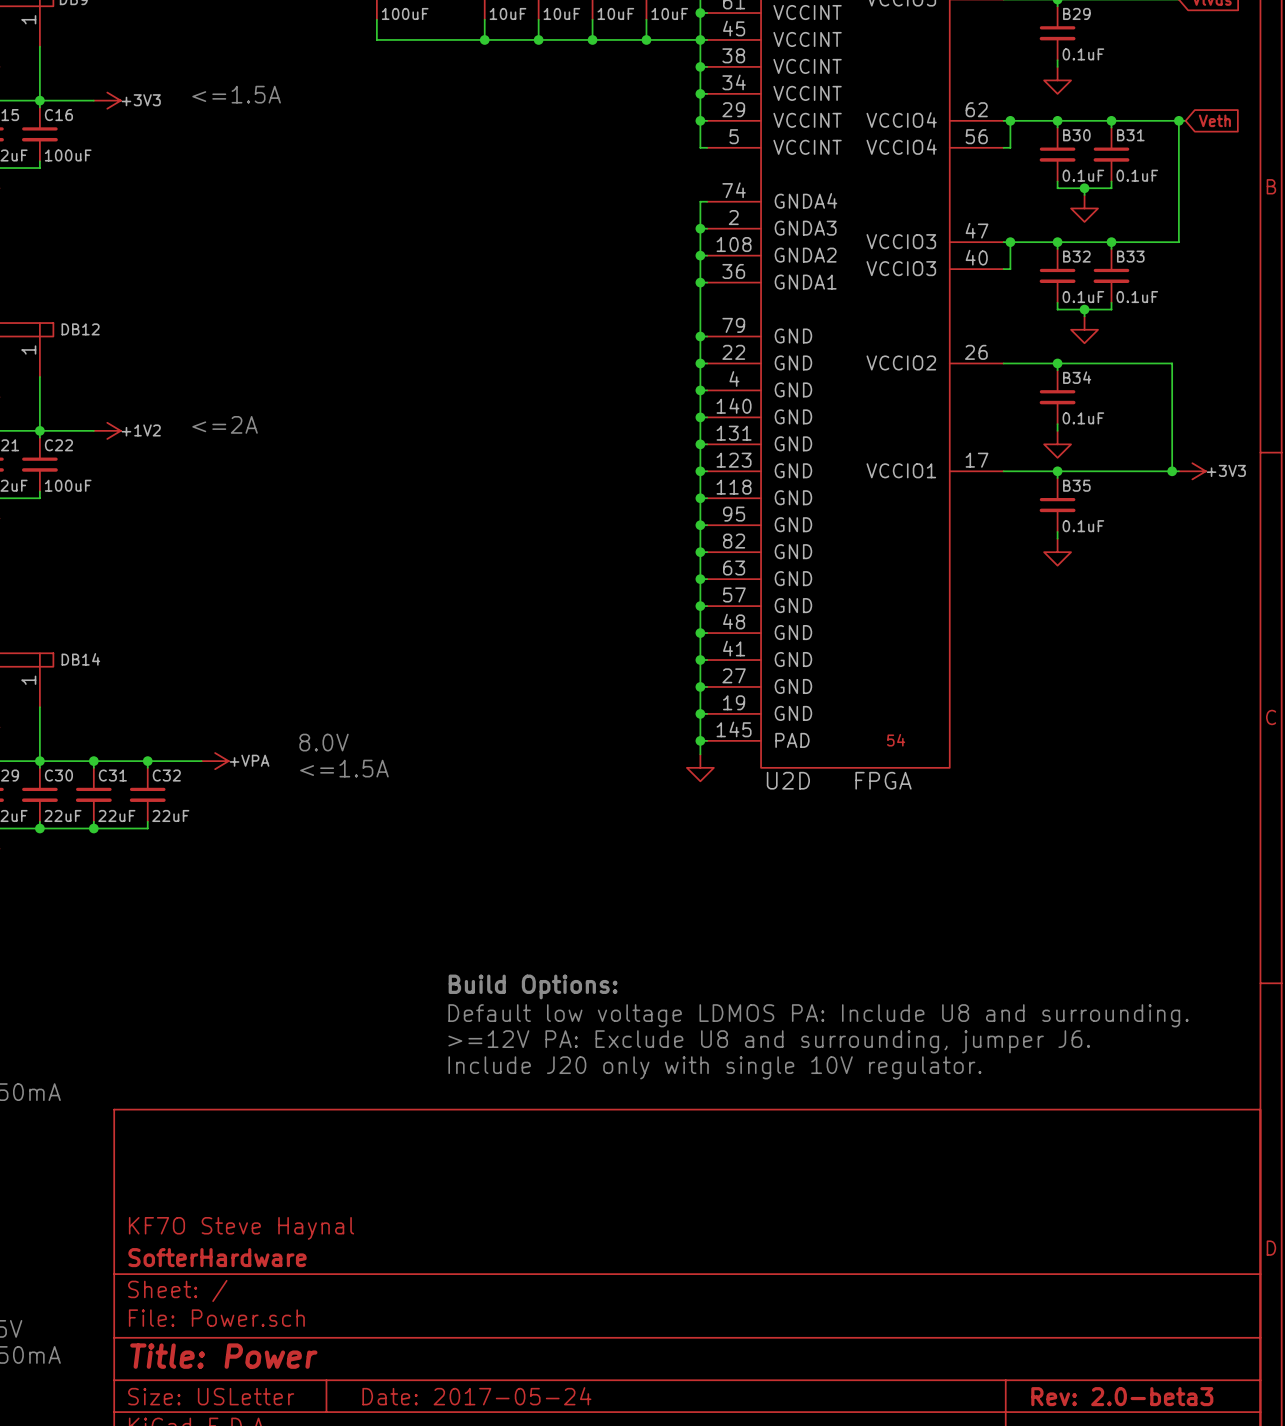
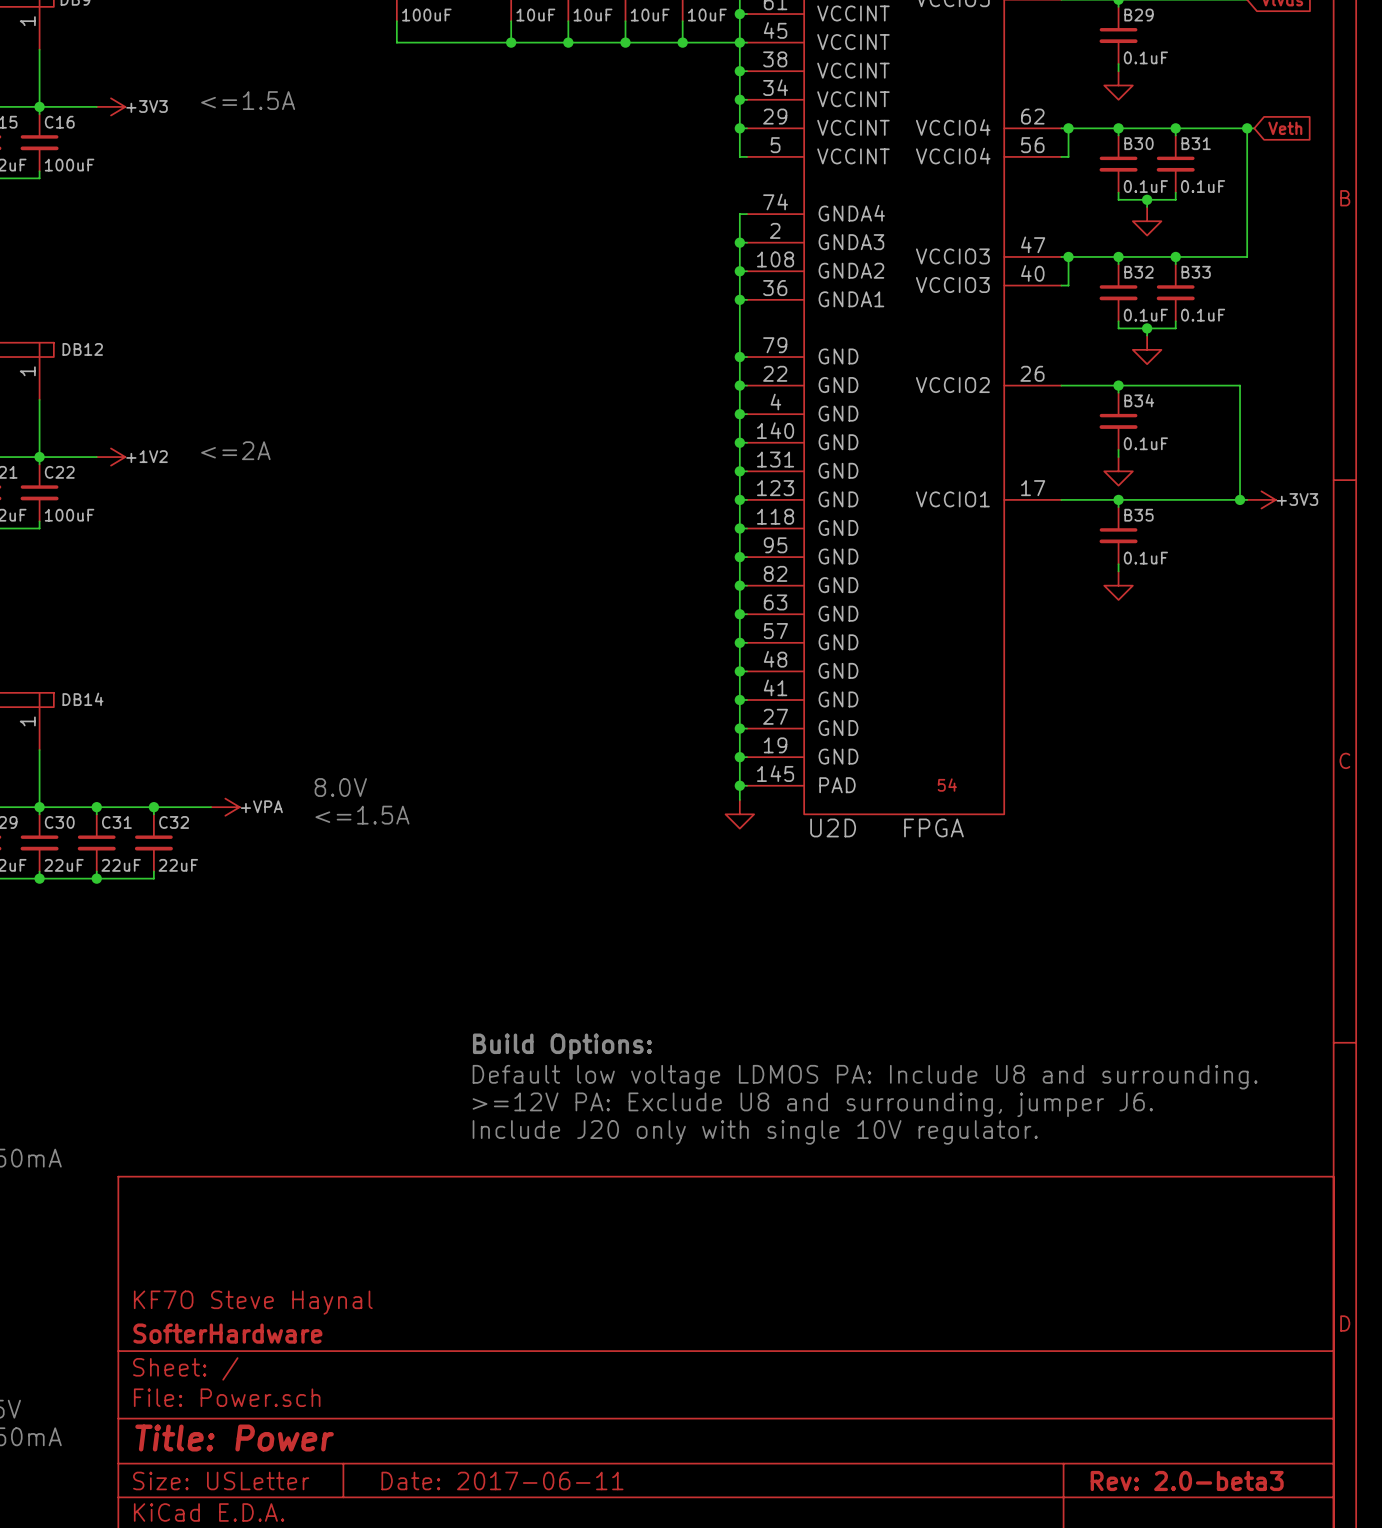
title block: Date: 2017-05-24 (476, 1396) -> Date: 2017-06-11 (502, 1480)

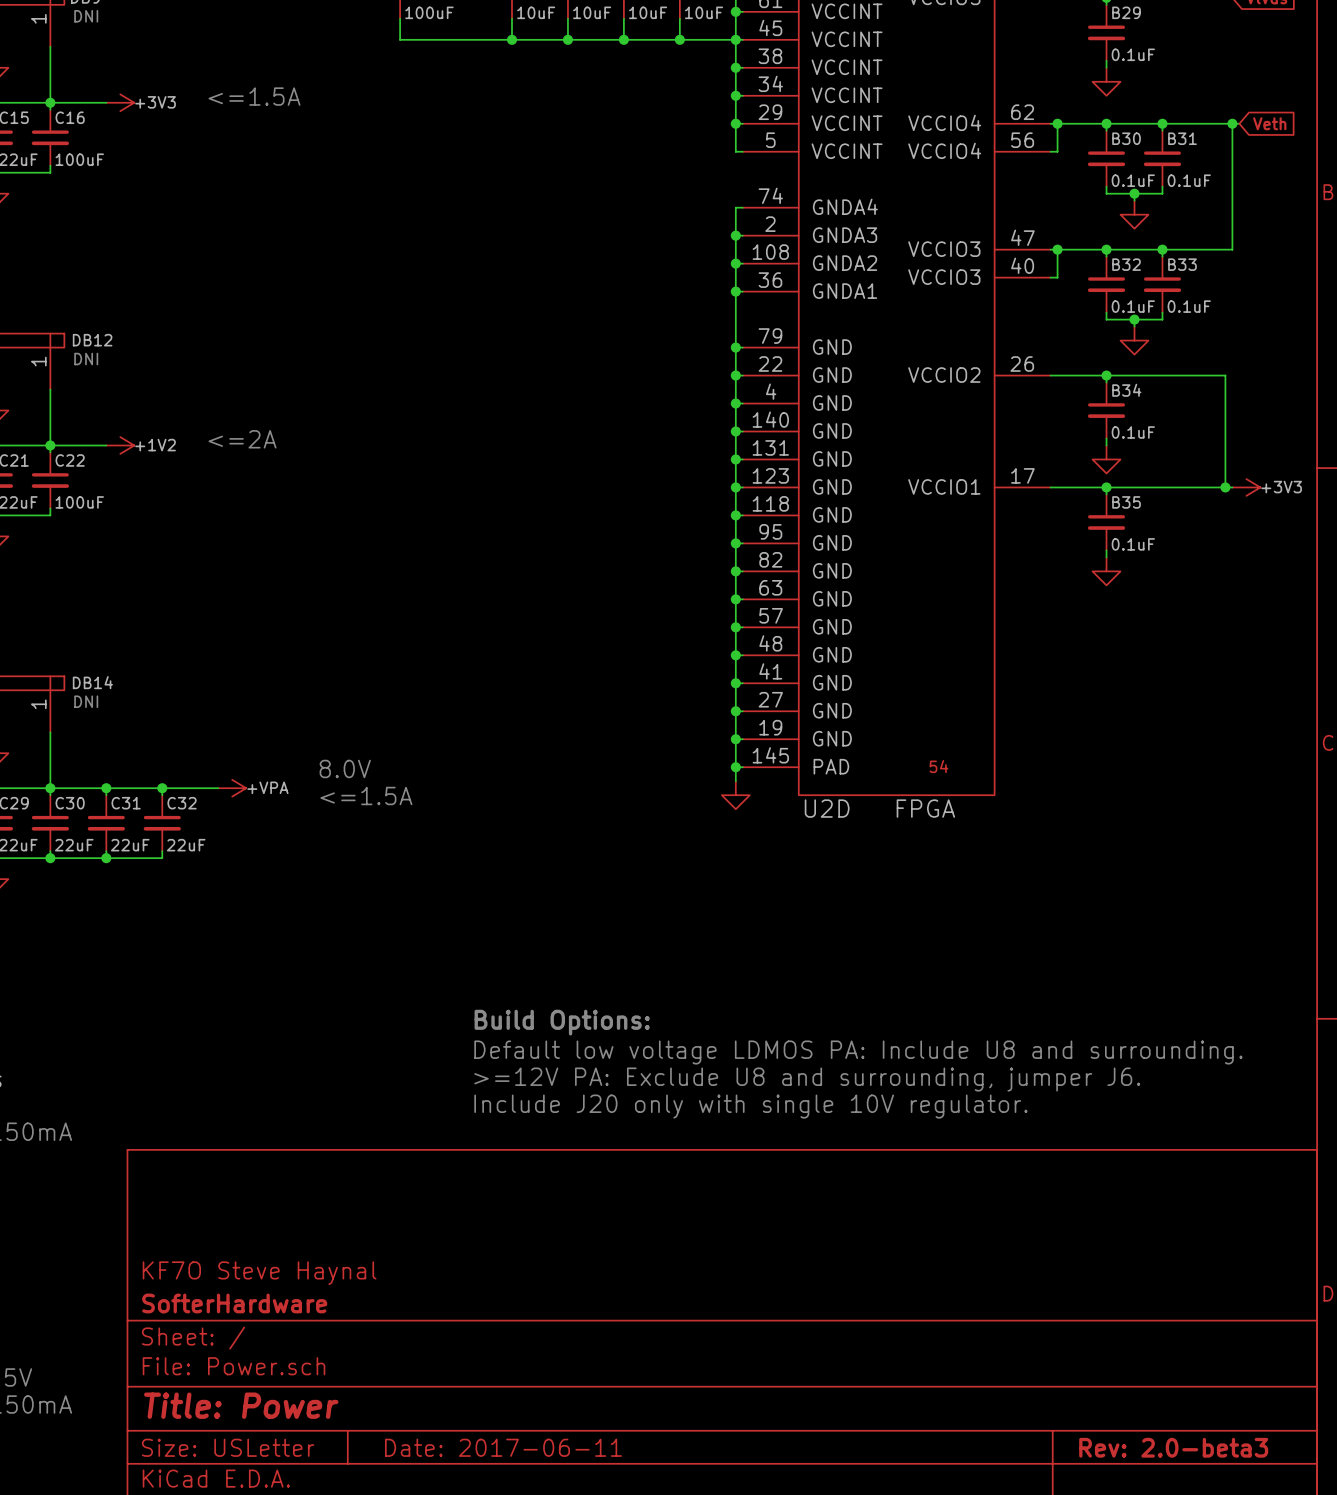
text: none -> DNI (86, 16)
text: none -> DNI (86, 359)
text: none -> DNI (86, 701)

